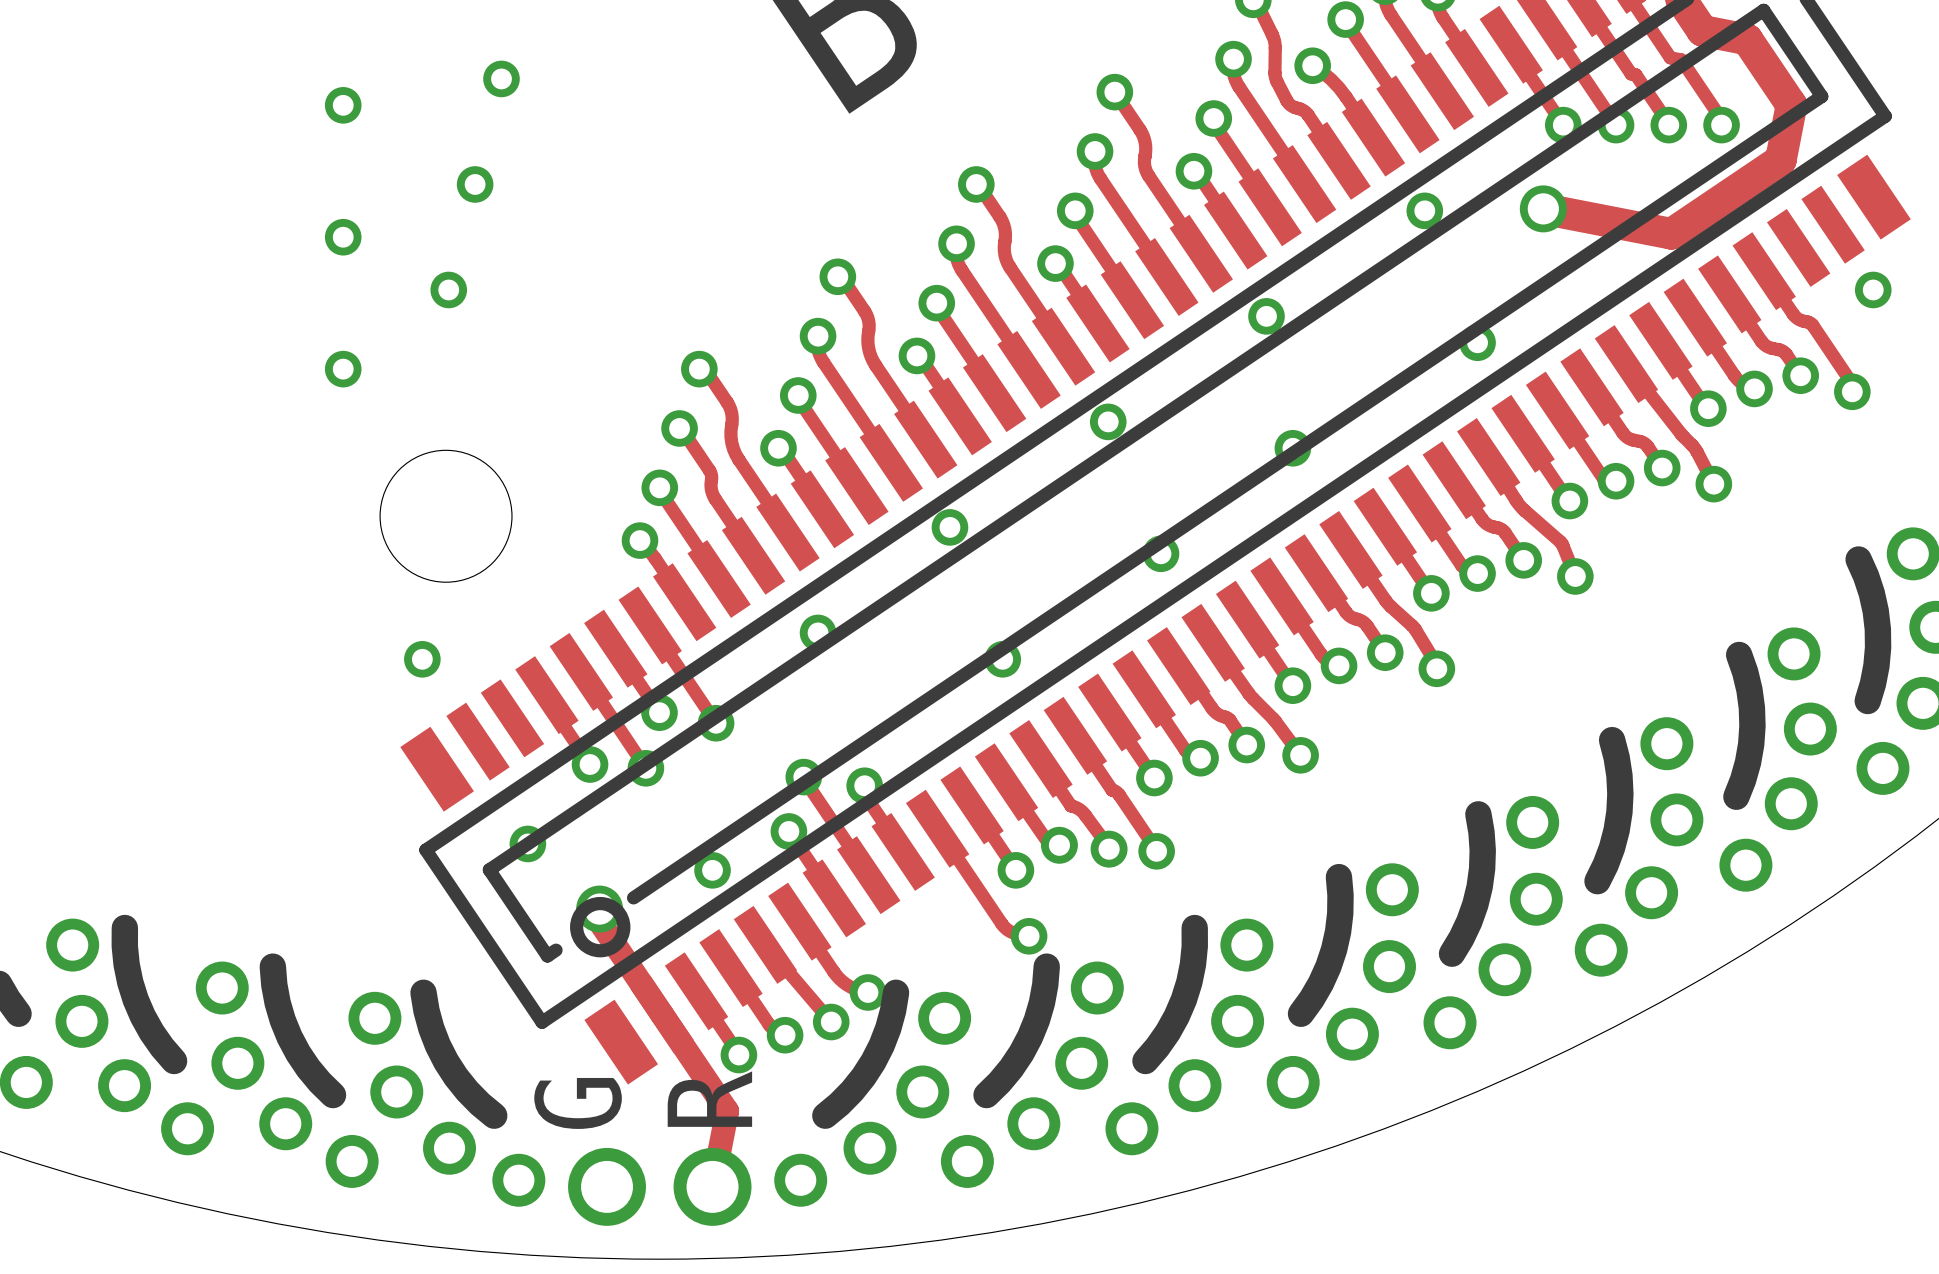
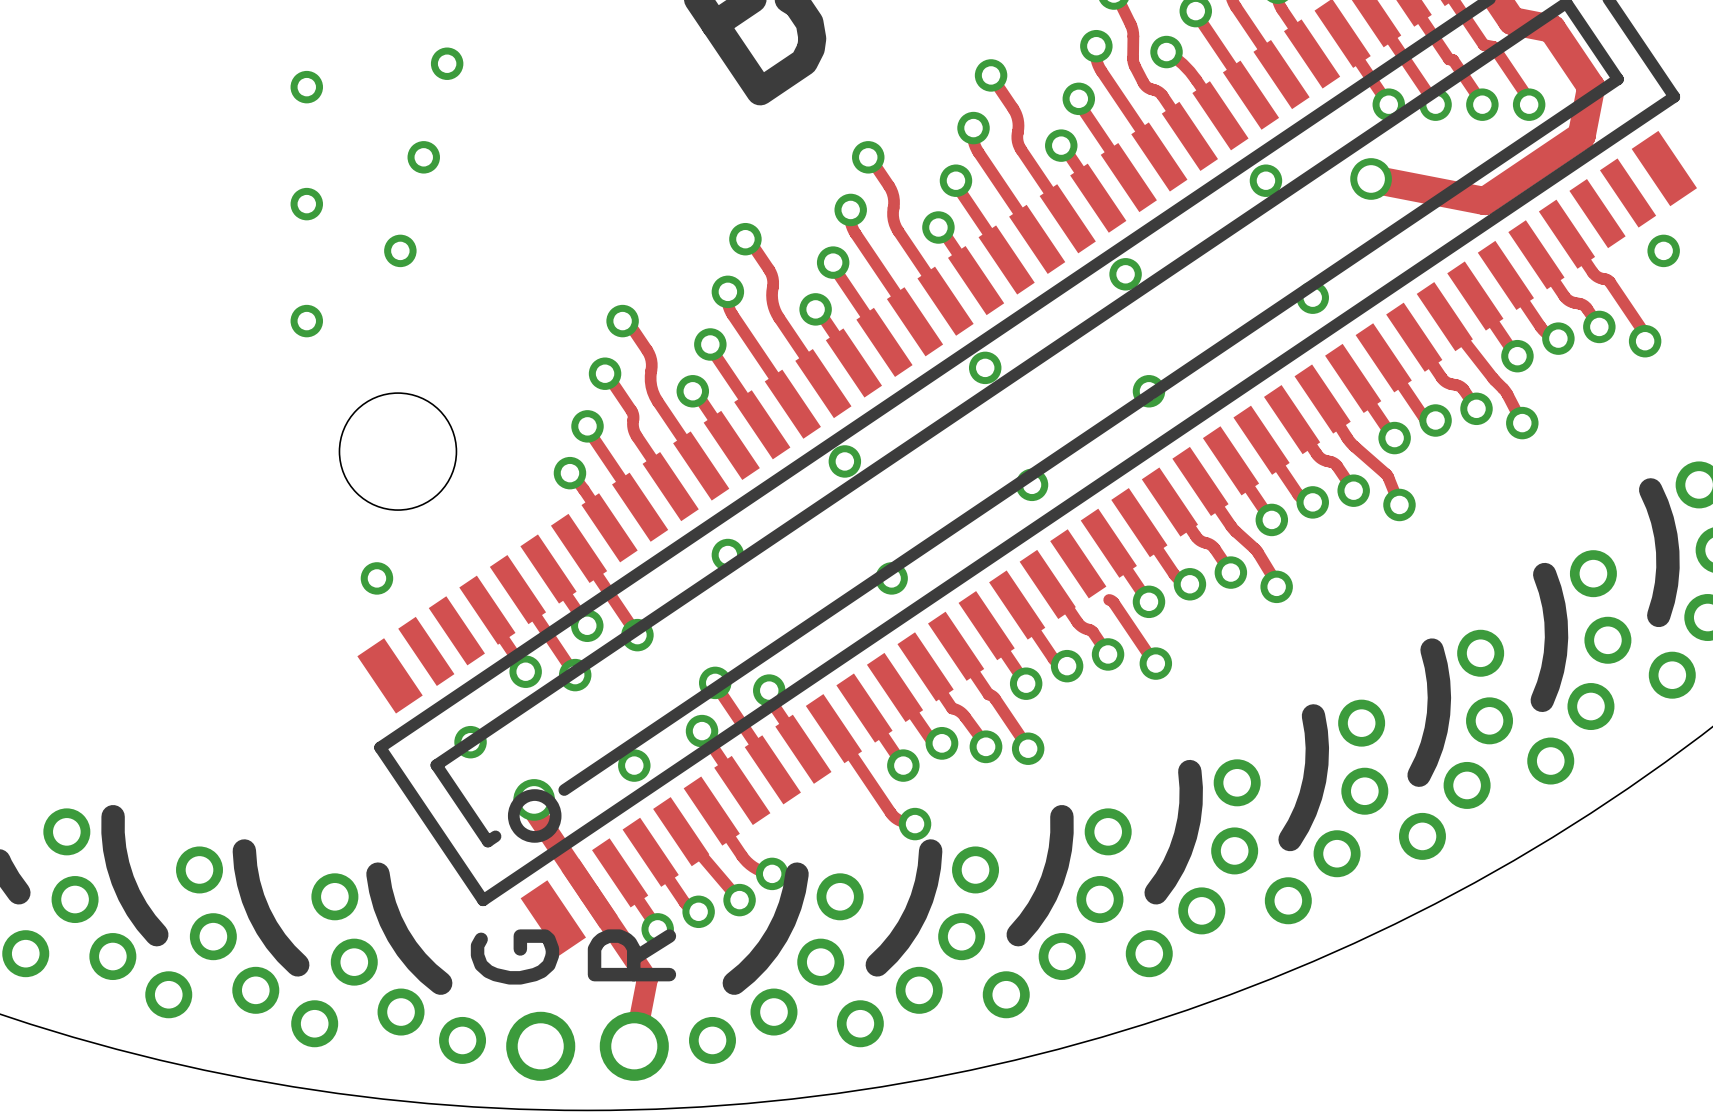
track: (1213, 642) (1250, 696) (1274, 720) (1300, 755) -> (1109, 599) (1113, 603) (1155, 663)

